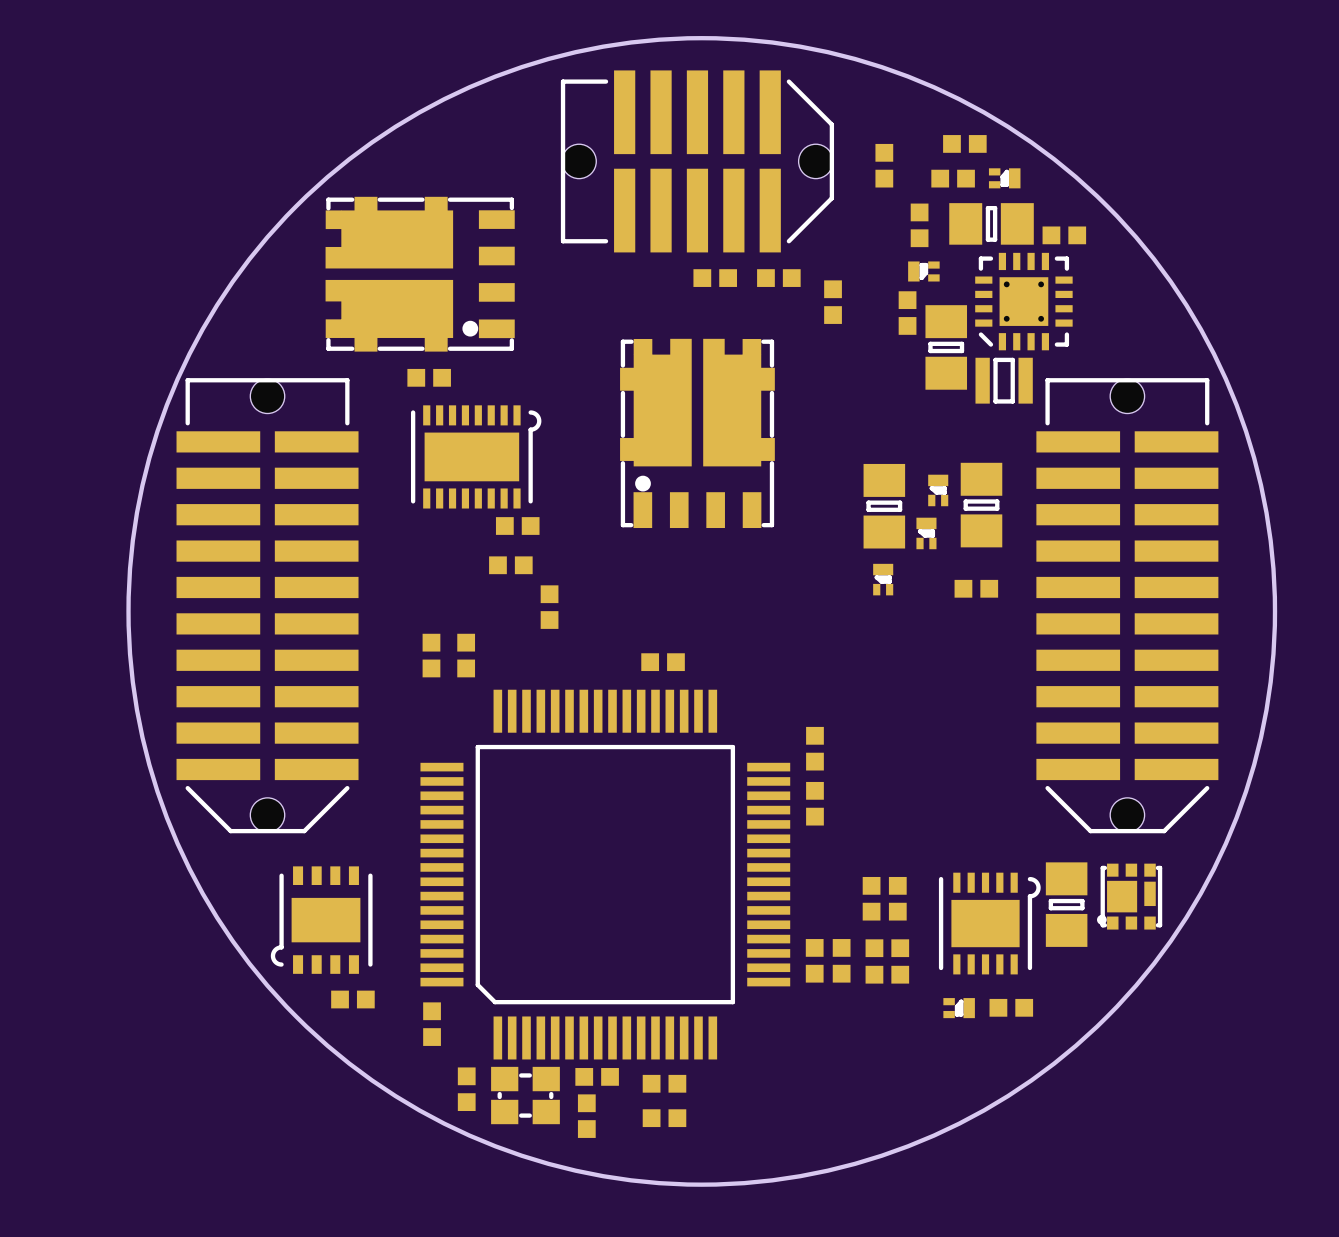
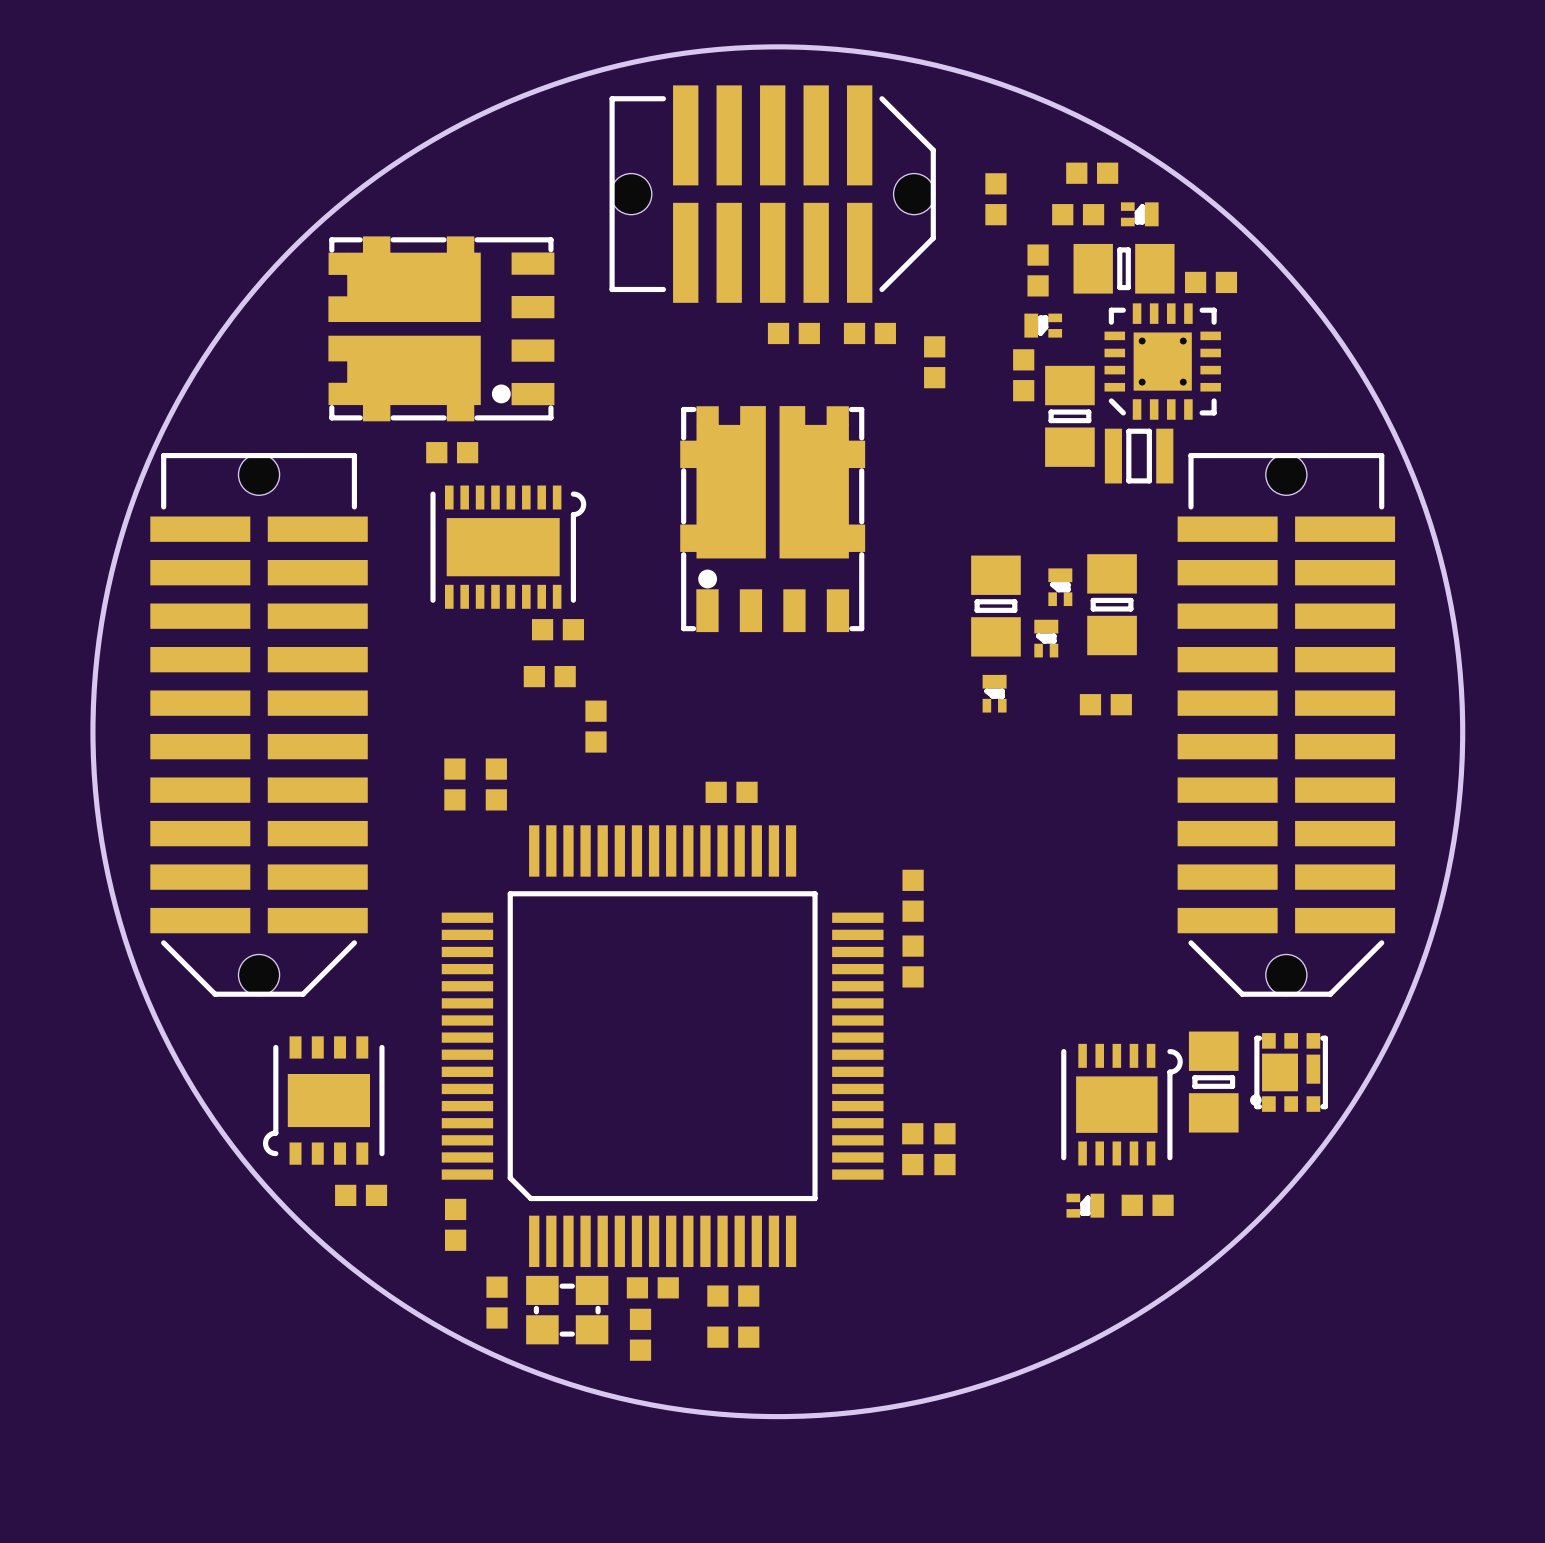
part: (871, 898) -> none
part: (897, 898) -> none
part: (887, 948) -> none
part: (887, 974) -> none

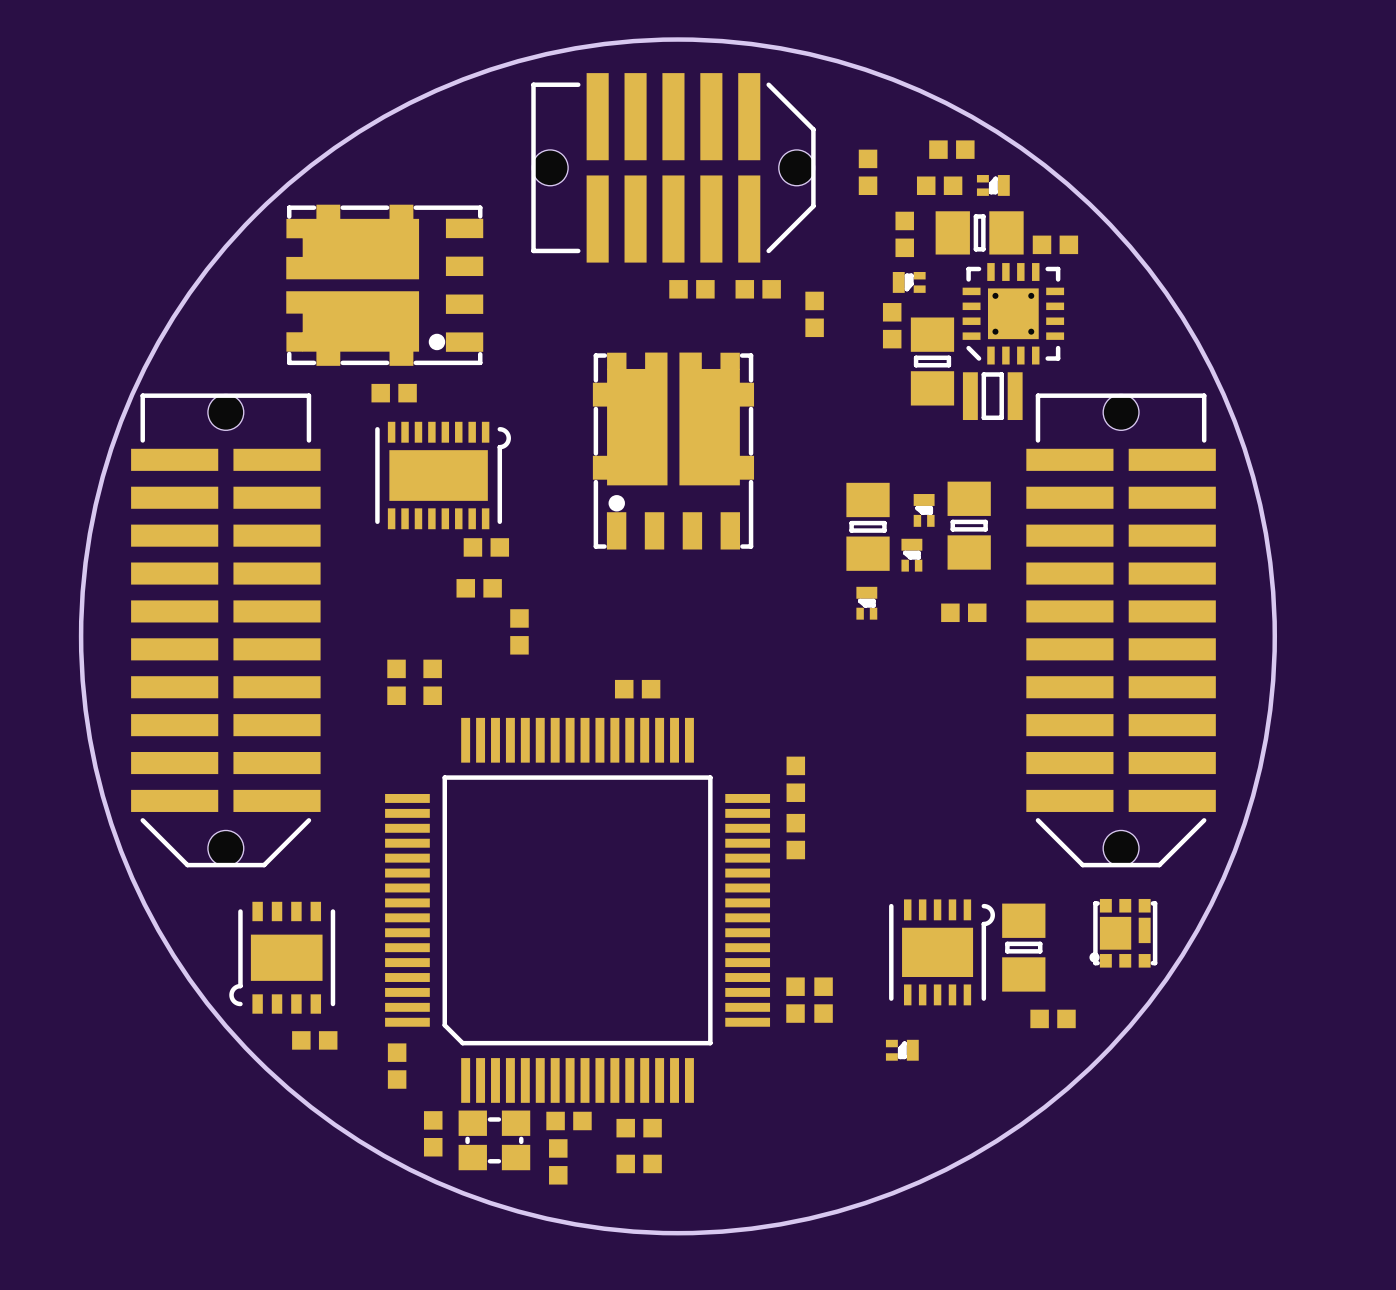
part position: (1213, 1082) -> (1023, 947)
part position: (1121, 1104) -> (942, 952)
part position: (1085, 1205) -> (902, 1050)
part position: (1147, 1205) -> (1053, 1018)

